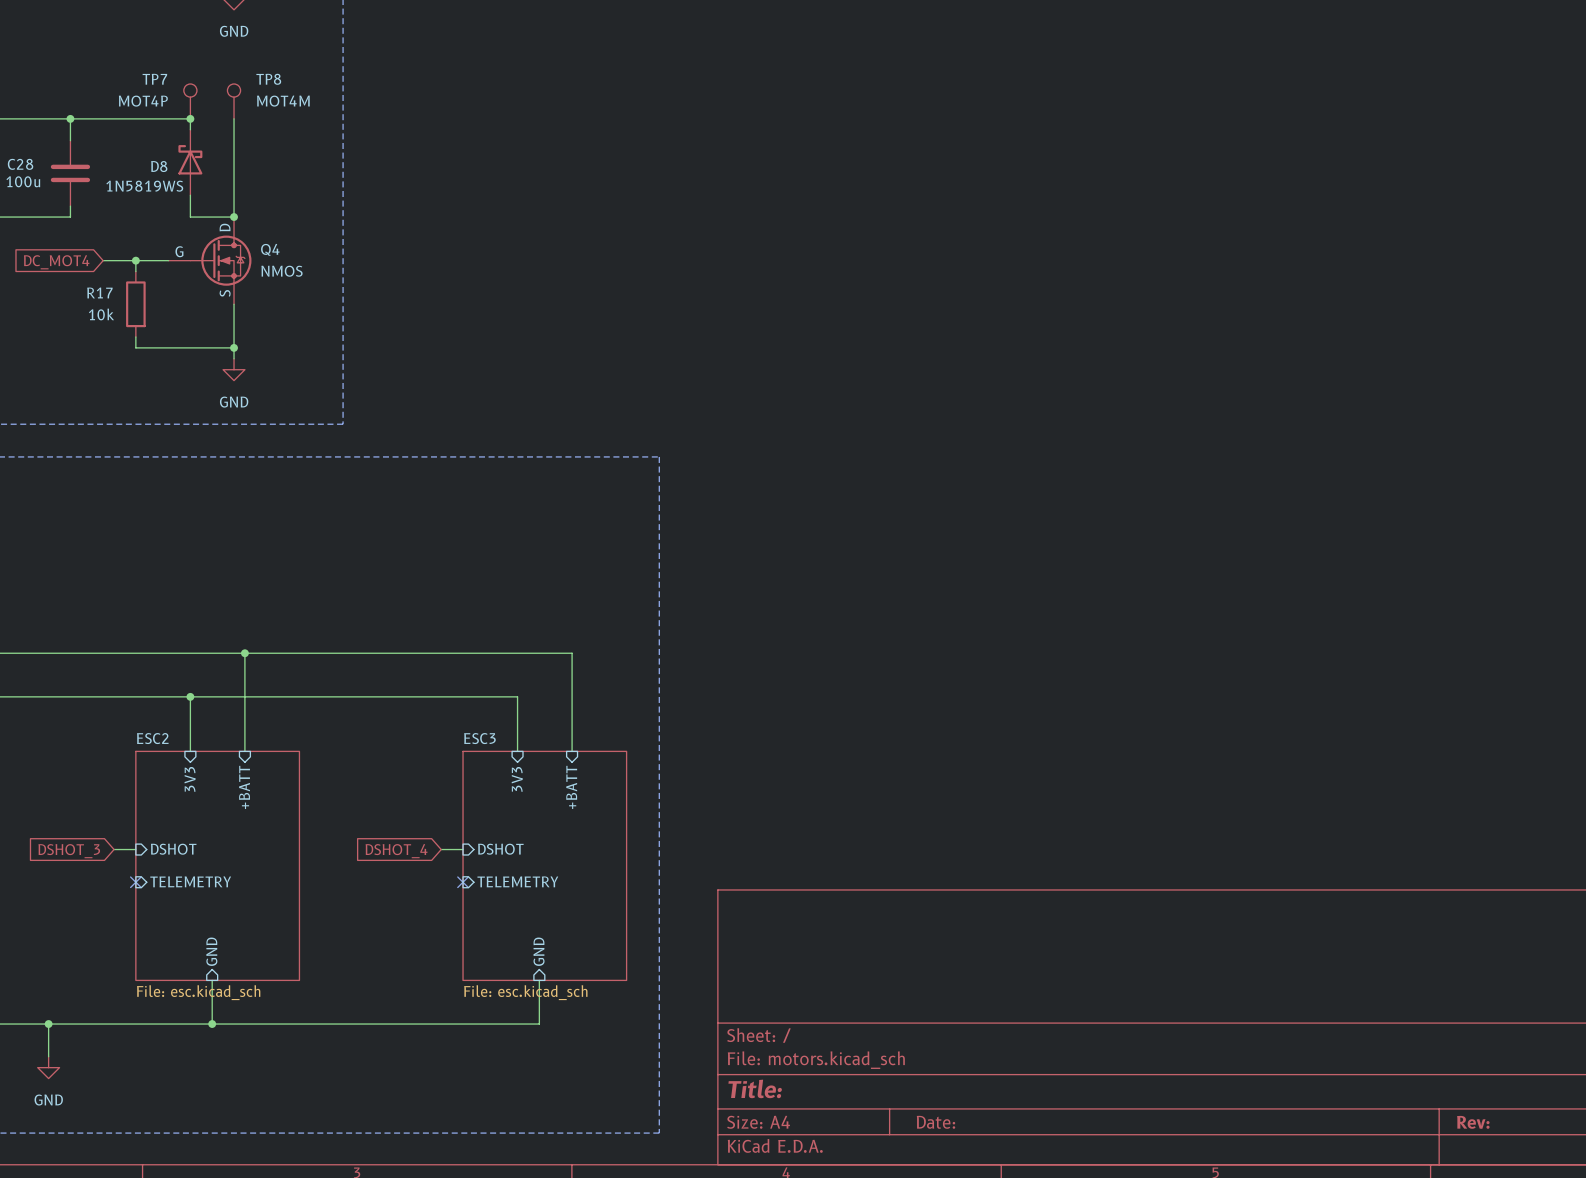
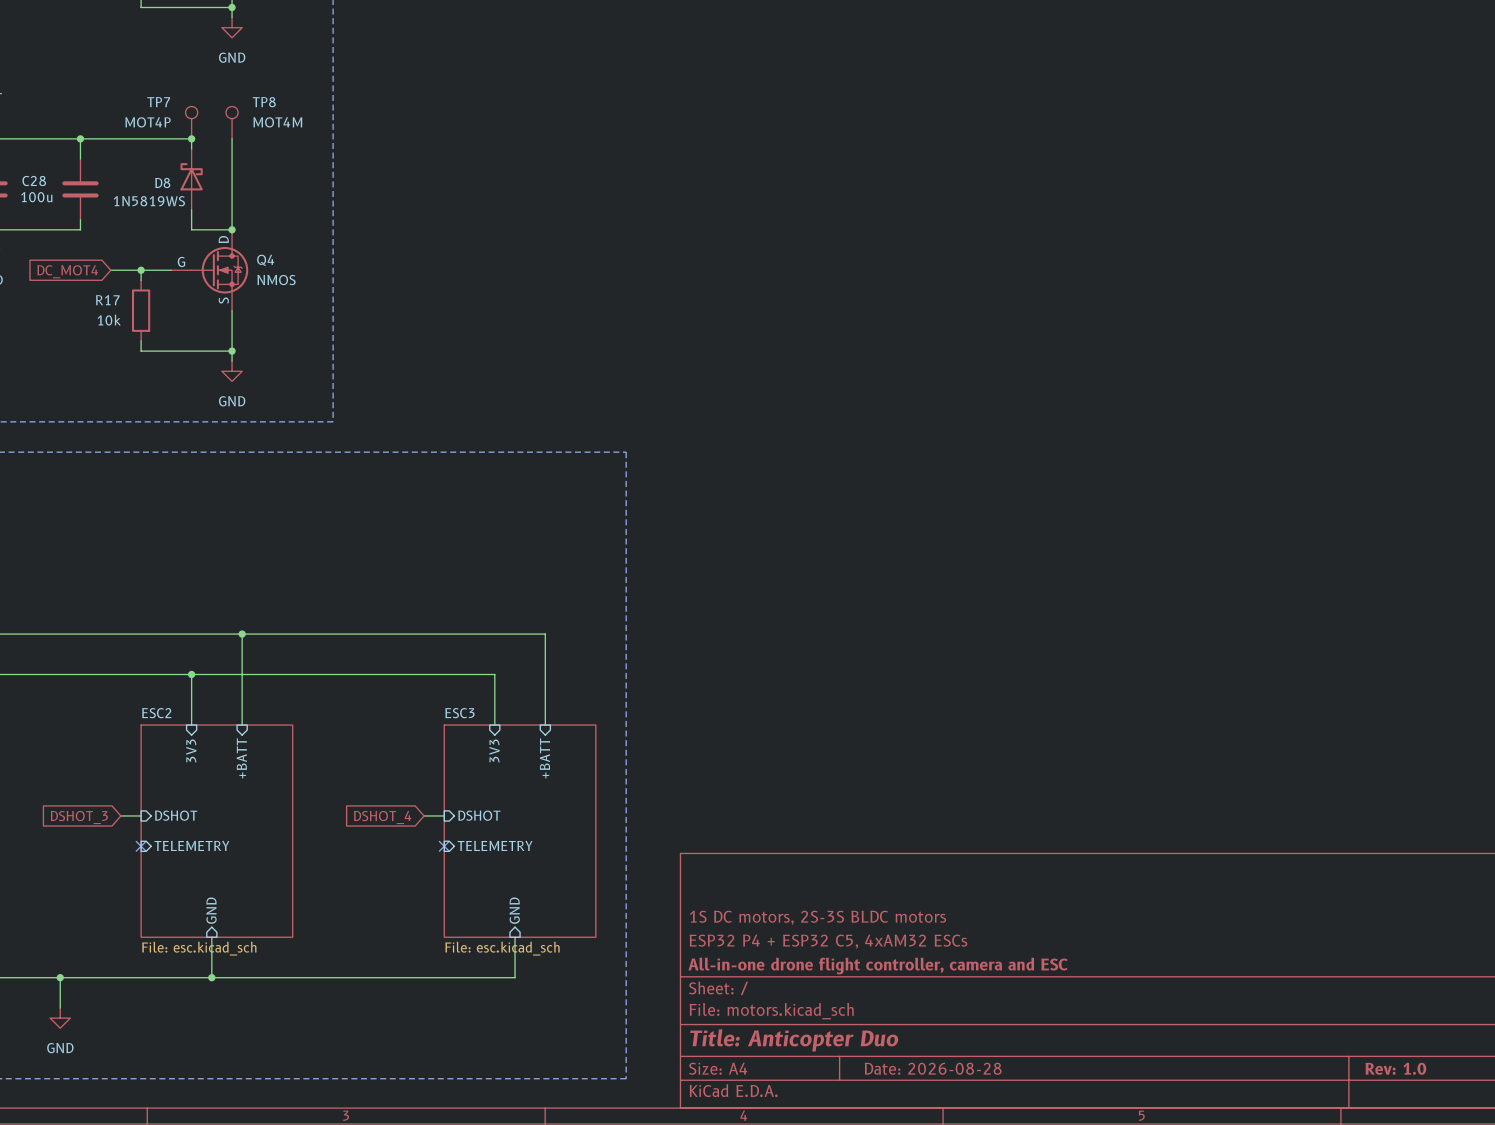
title block: none -> 1S DC motors, 2S-3S BLDC motors (817, 917)
title block: none -> ESP32 P4 + ESP32 C5, 4xAM32 ESCs (828, 941)
title block: none -> All-in-one drone flight controller, camera and ESC (878, 966)
title block: Title: (755, 1088) -> Title: Anticopter Duo (794, 1040)
title block: Date: (936, 1122) -> Date: 2026-08-28 (933, 1068)
title block: Rev: (1473, 1122) -> Rev: 1.0 (1395, 1068)

